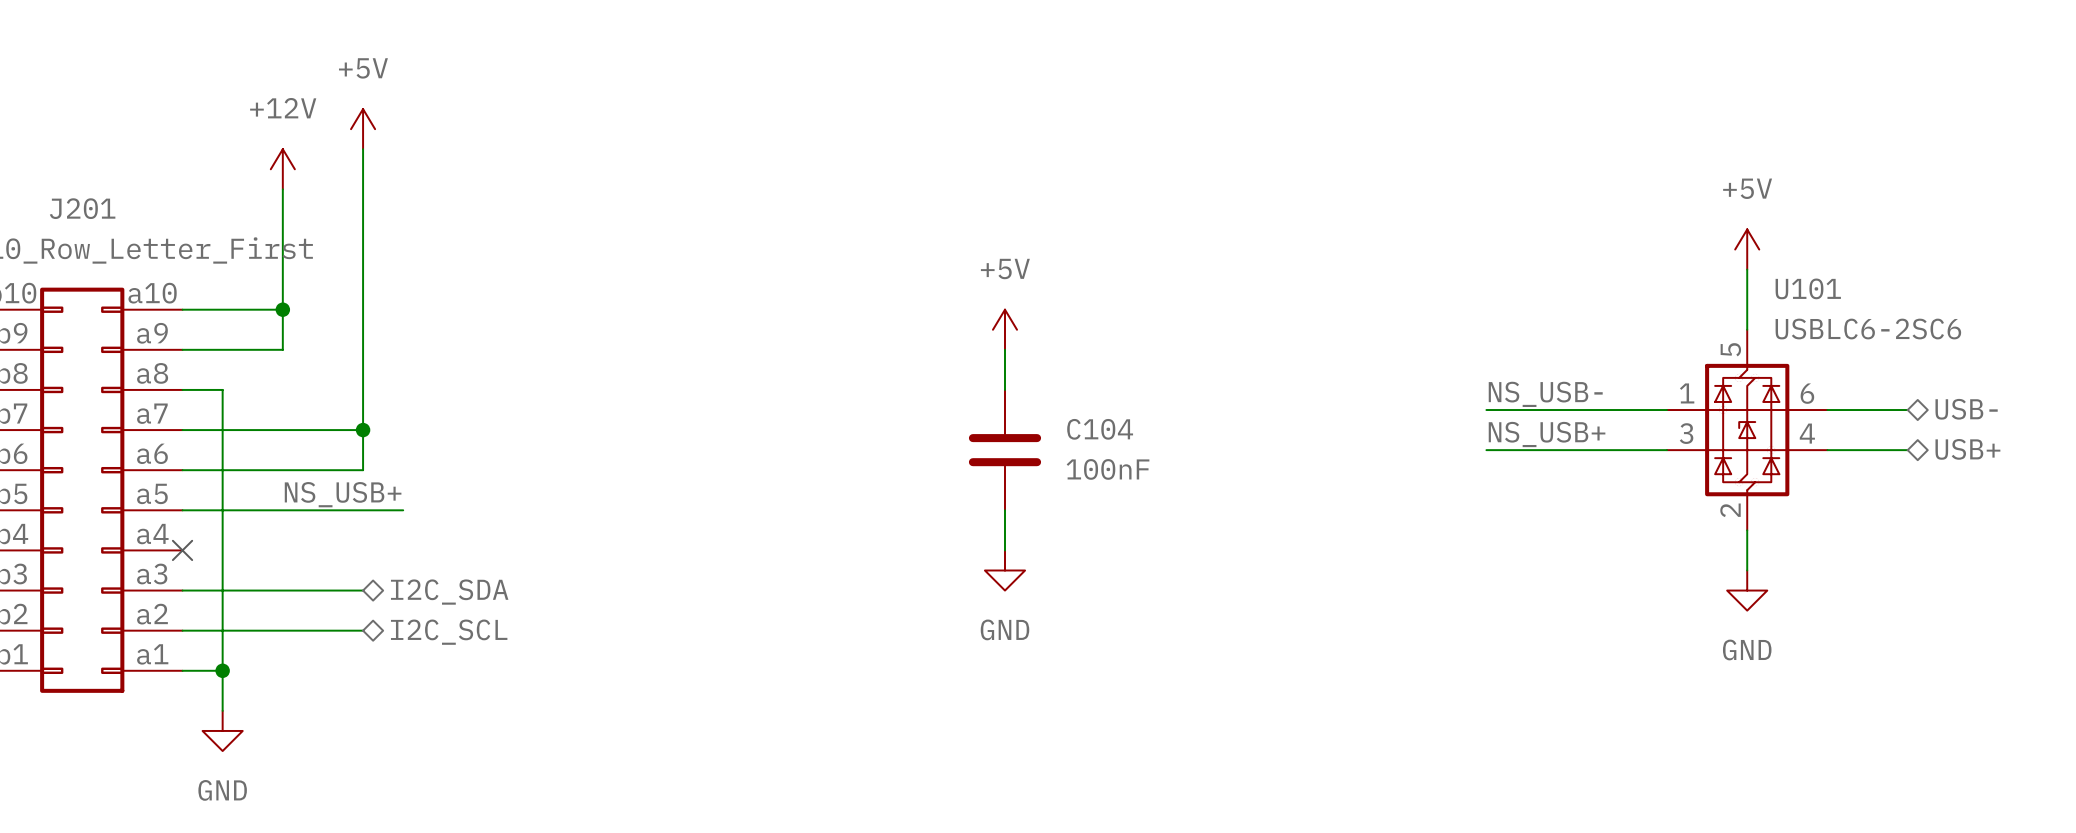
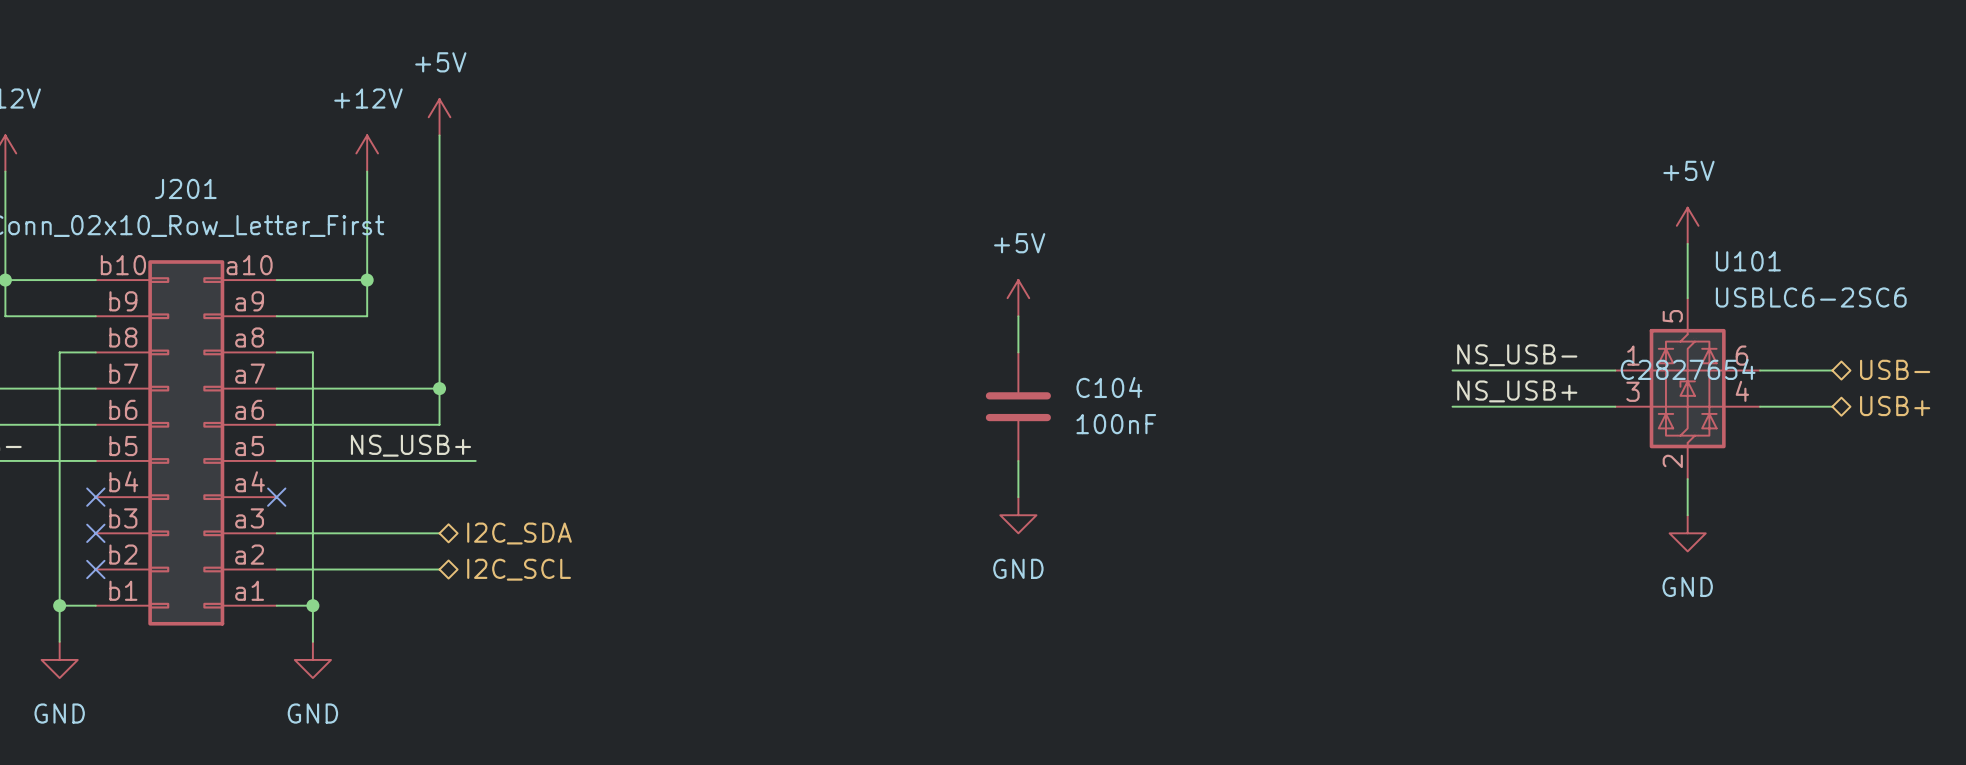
U101 text: none -> C2827654 (1688, 369)

